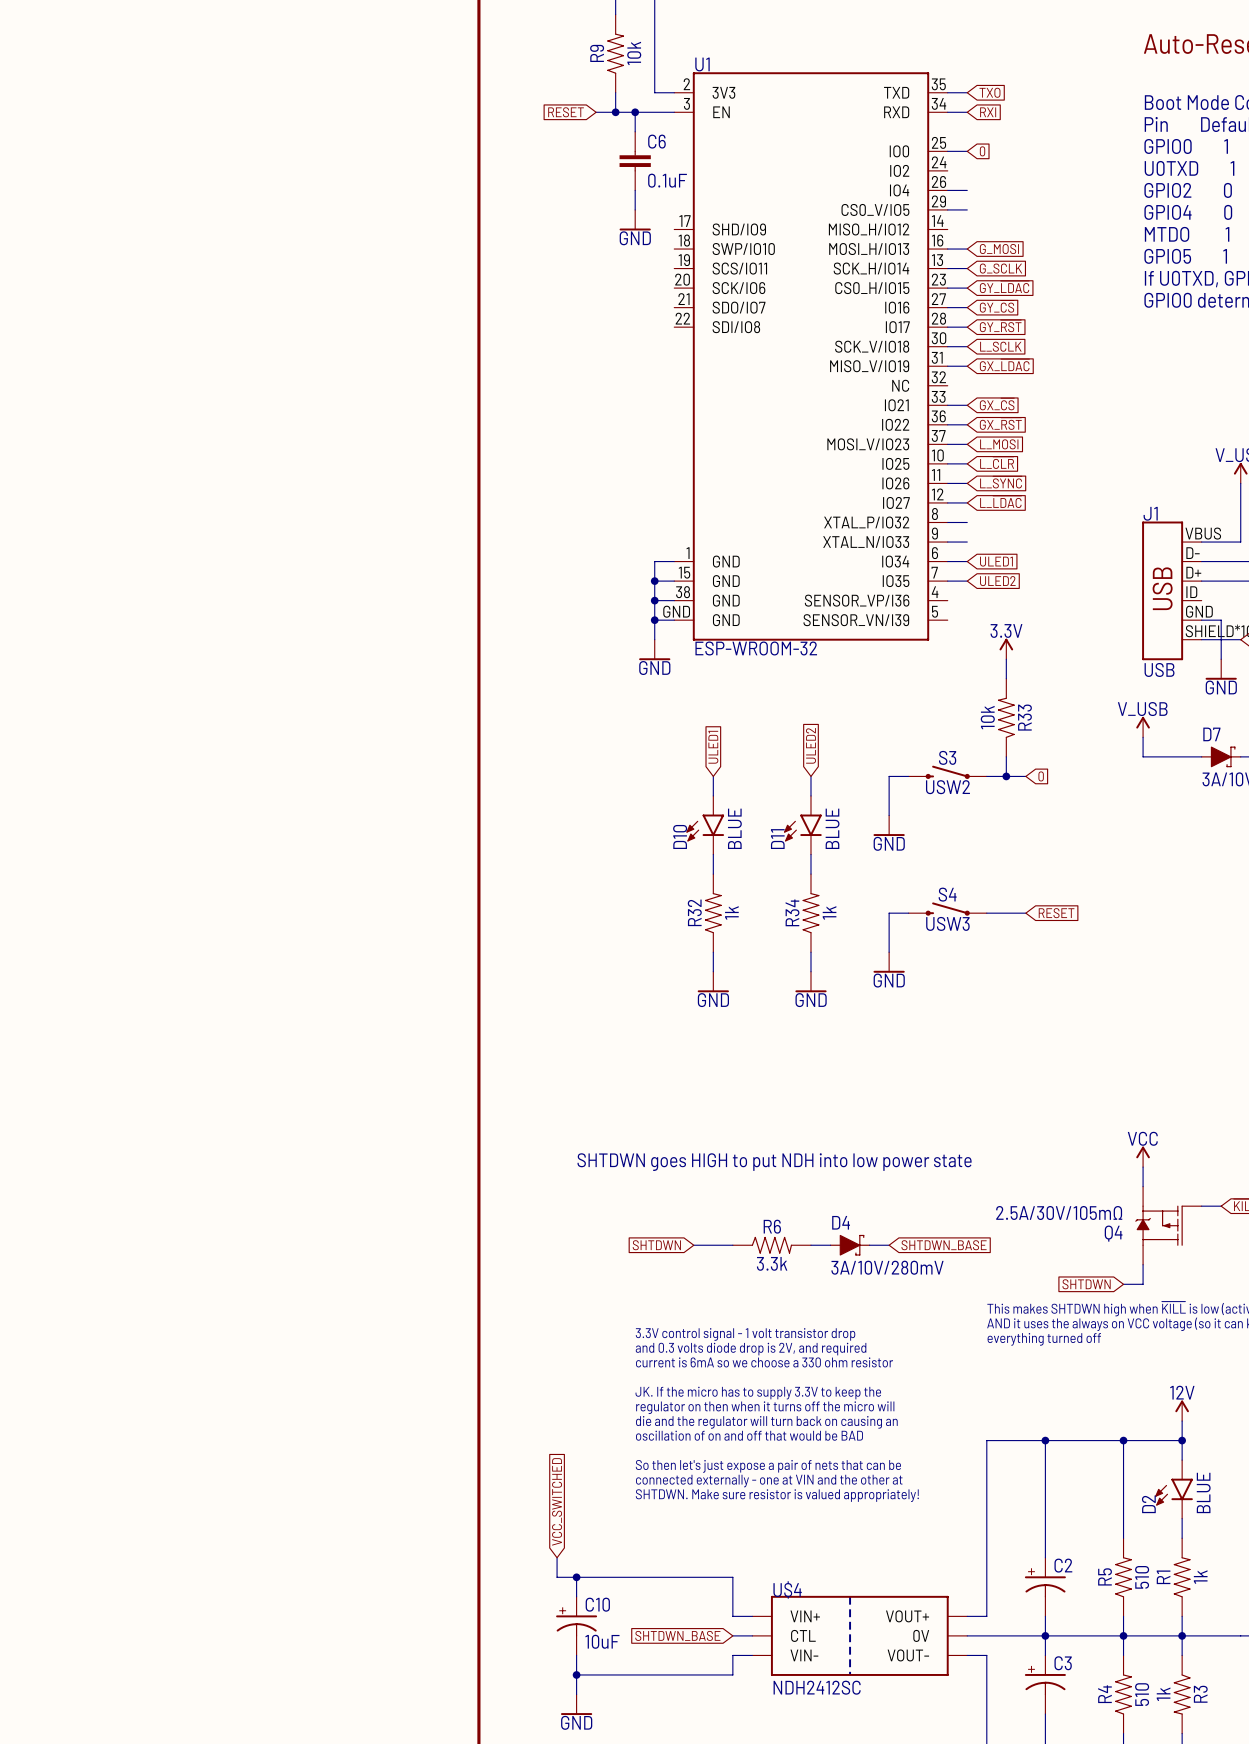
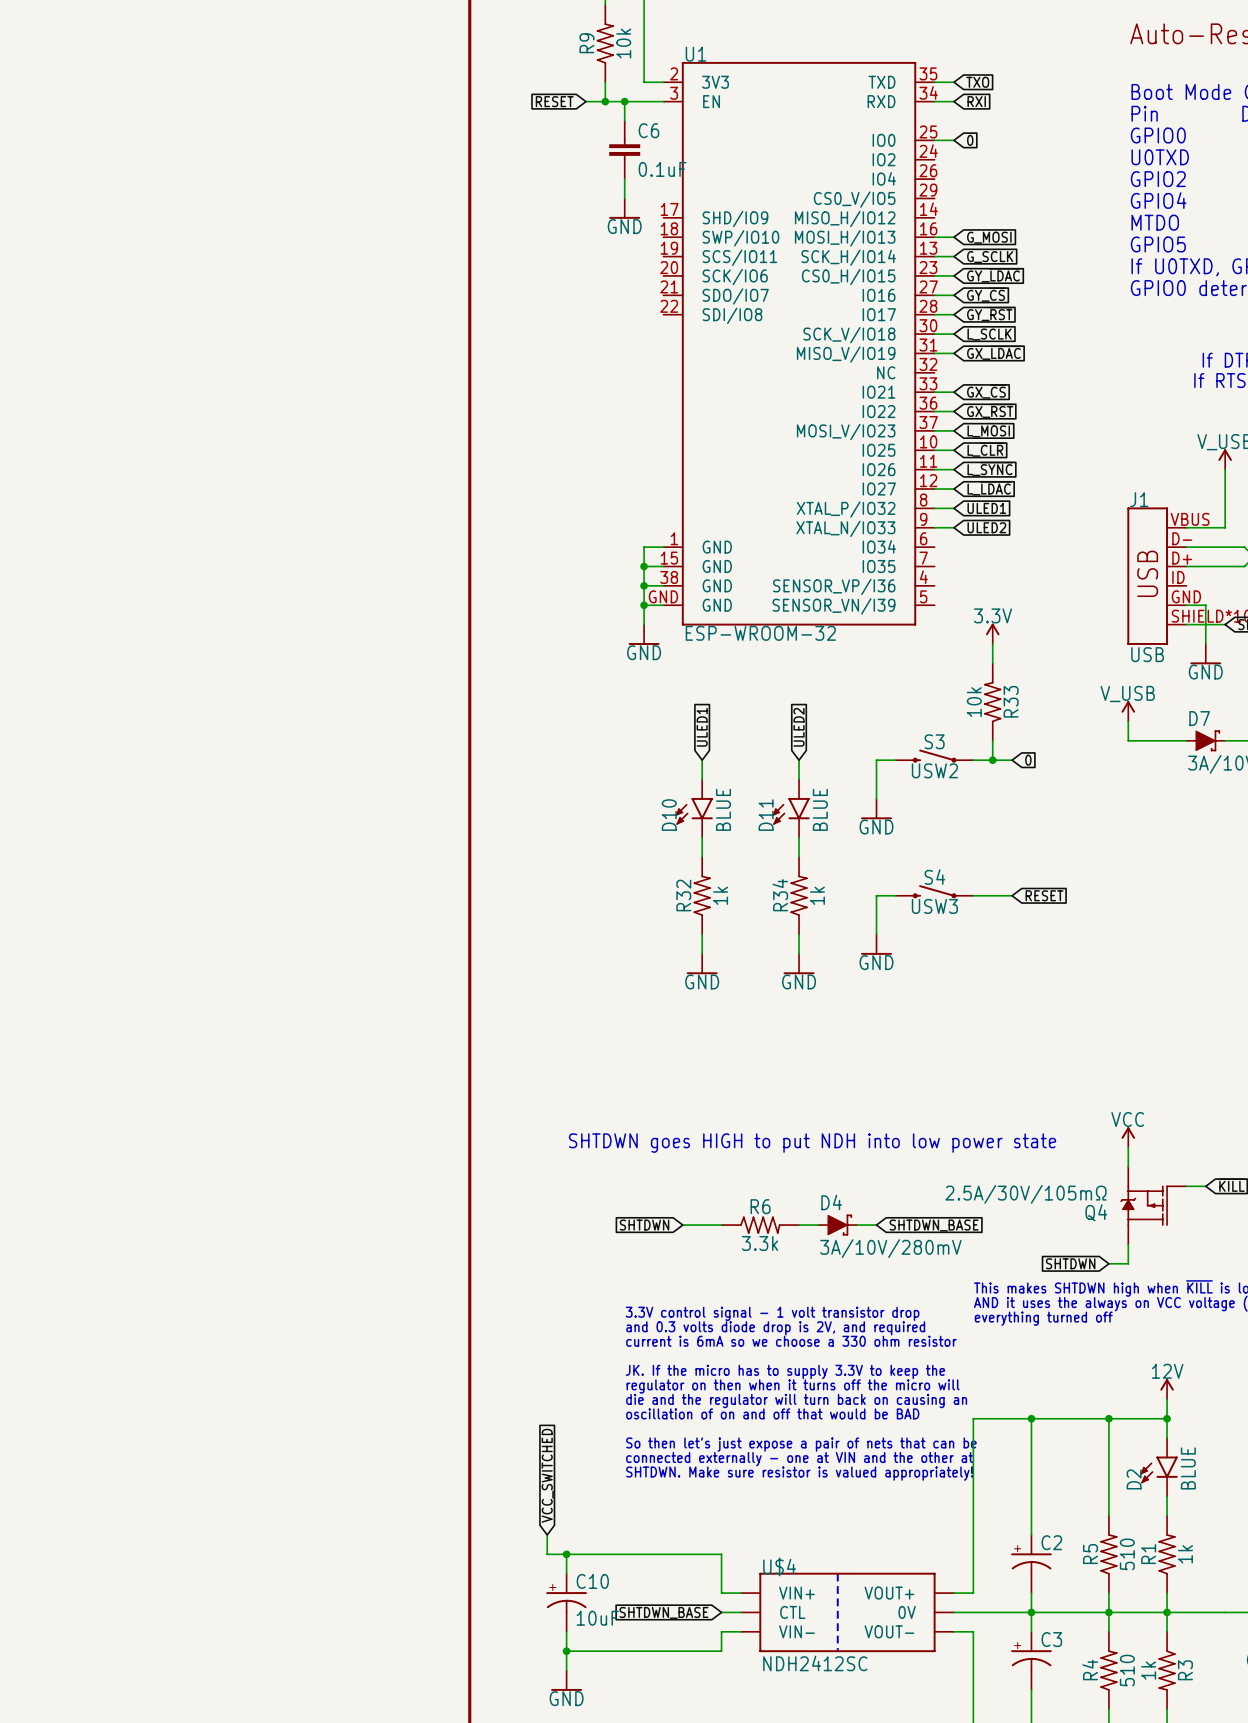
wire: (947, 190) (967, 190) -> none
wire: (947, 209) (967, 209) -> none
wire: (947, 561) (967, 561) -> none
global label position: ULED1 (996, 561) -> ULED1 (986, 508)
wire: (947, 581) (967, 581) -> none
global label position: ULED2 (997, 581) -> ULED2 (986, 527)

